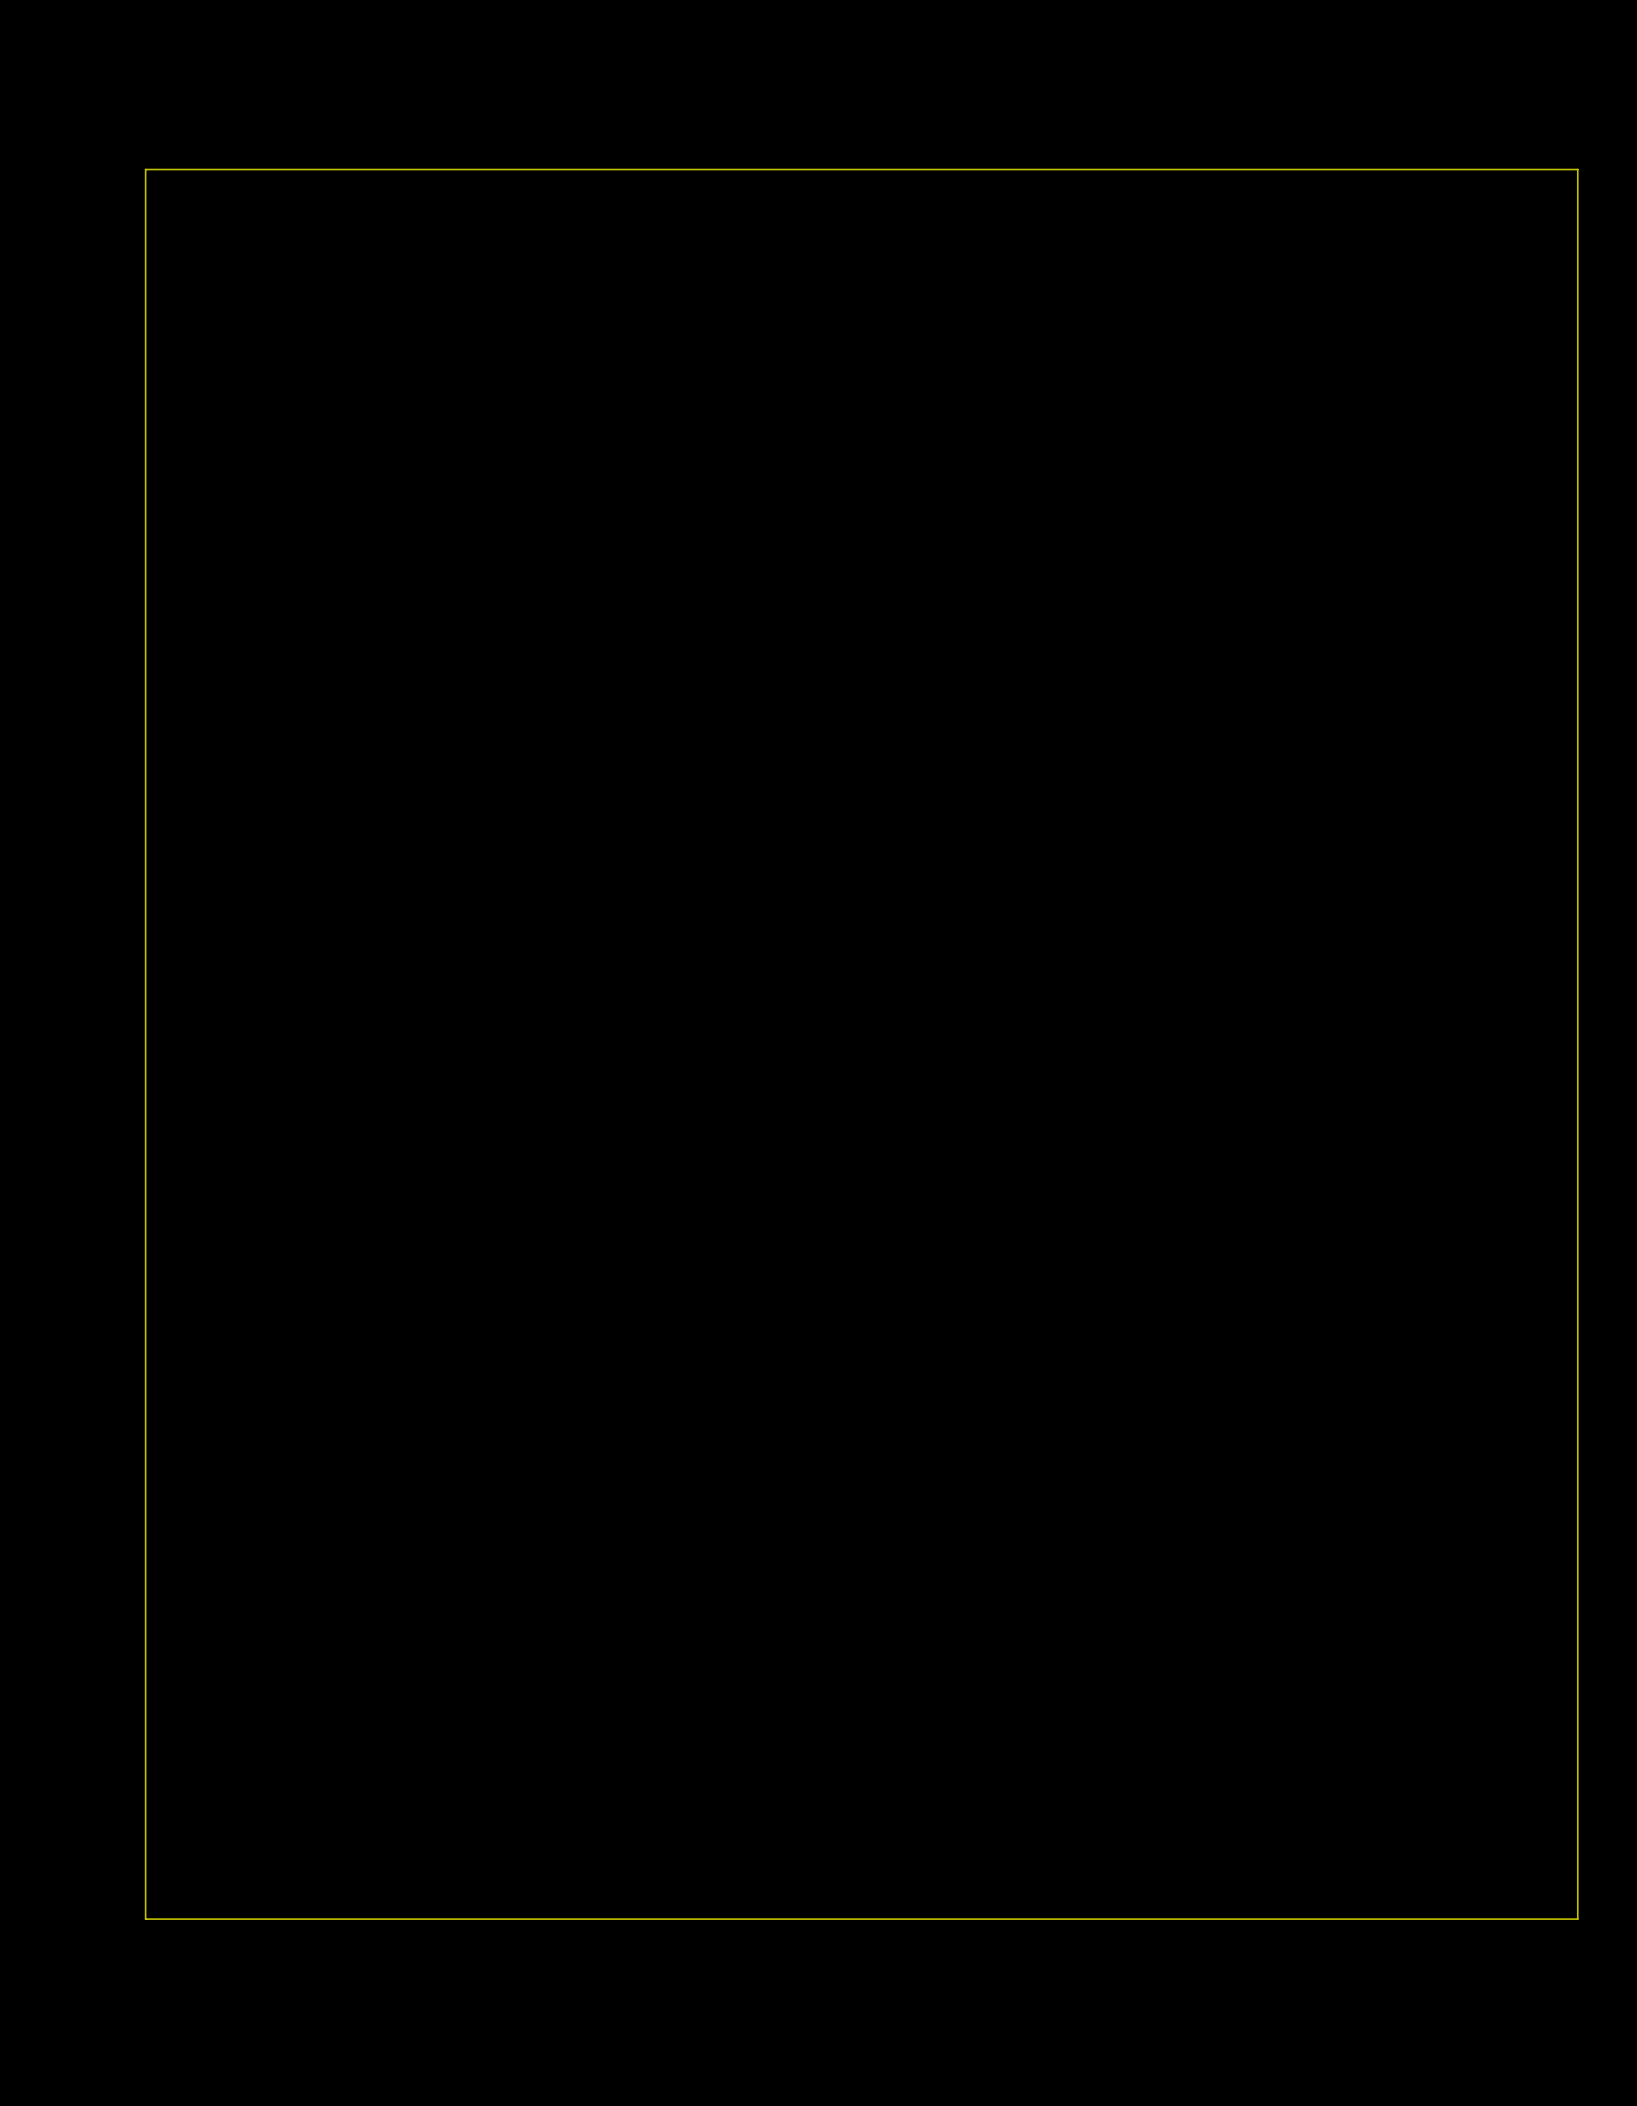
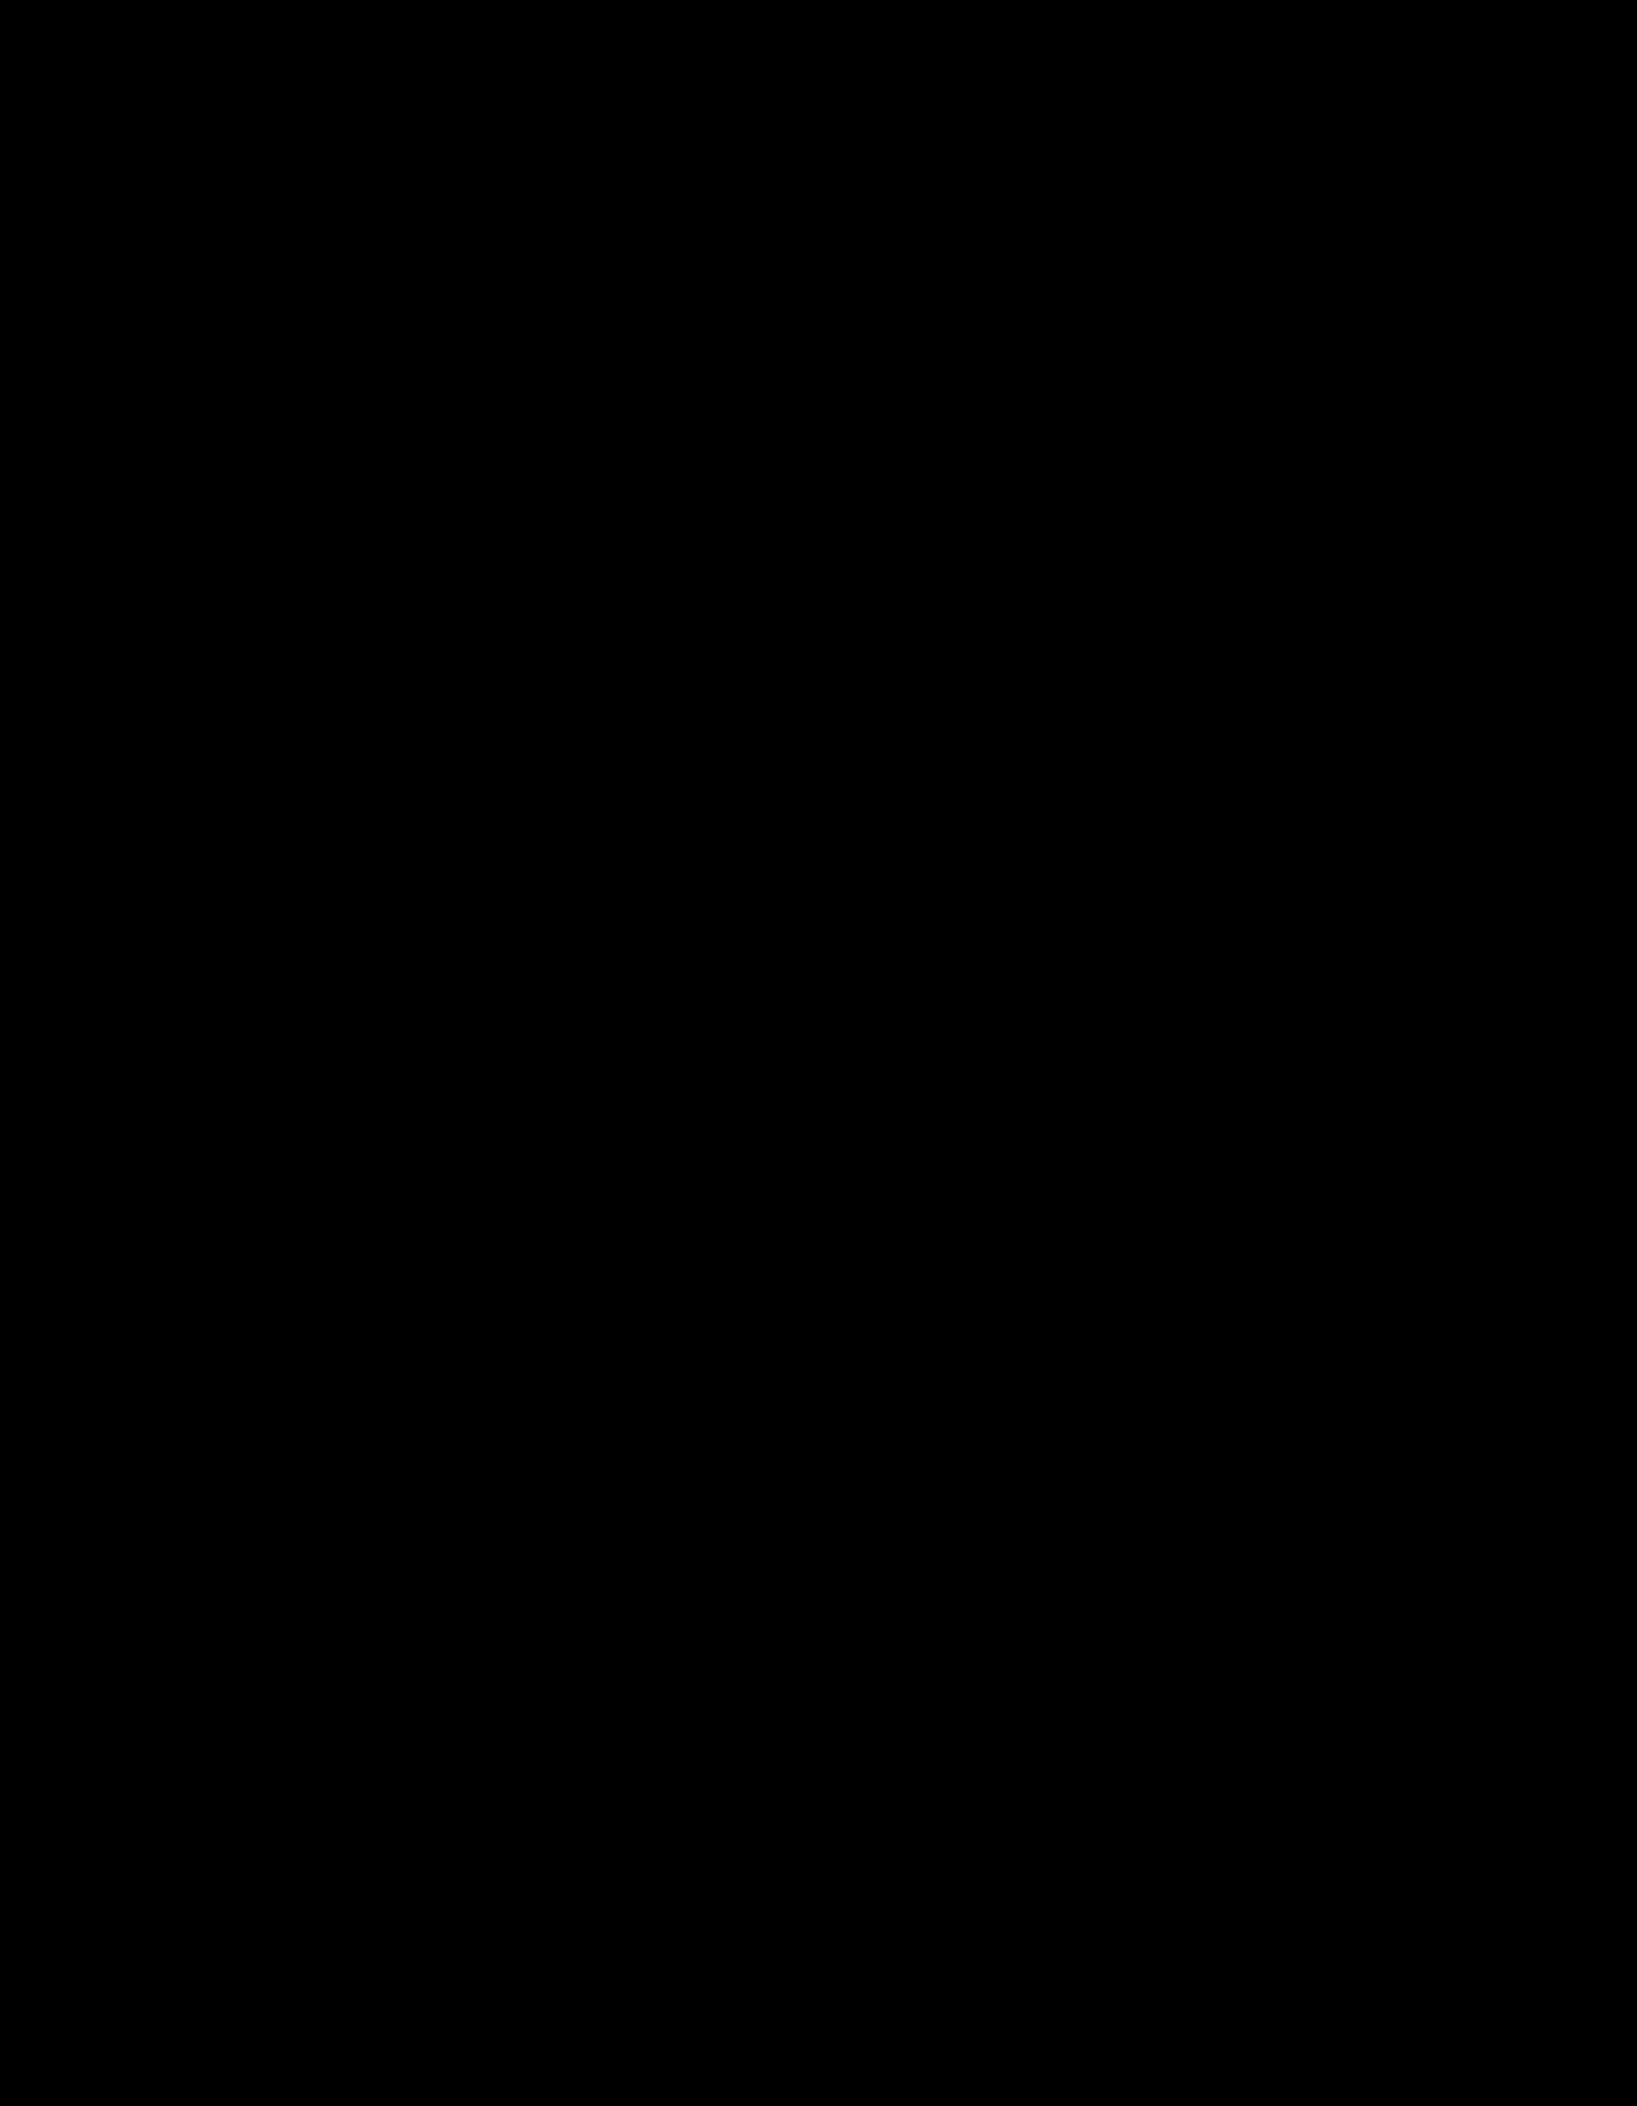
board edge: (145, 169) (1577, 169) (1577, 1919) (145, 1919) (145, 169) -> none

